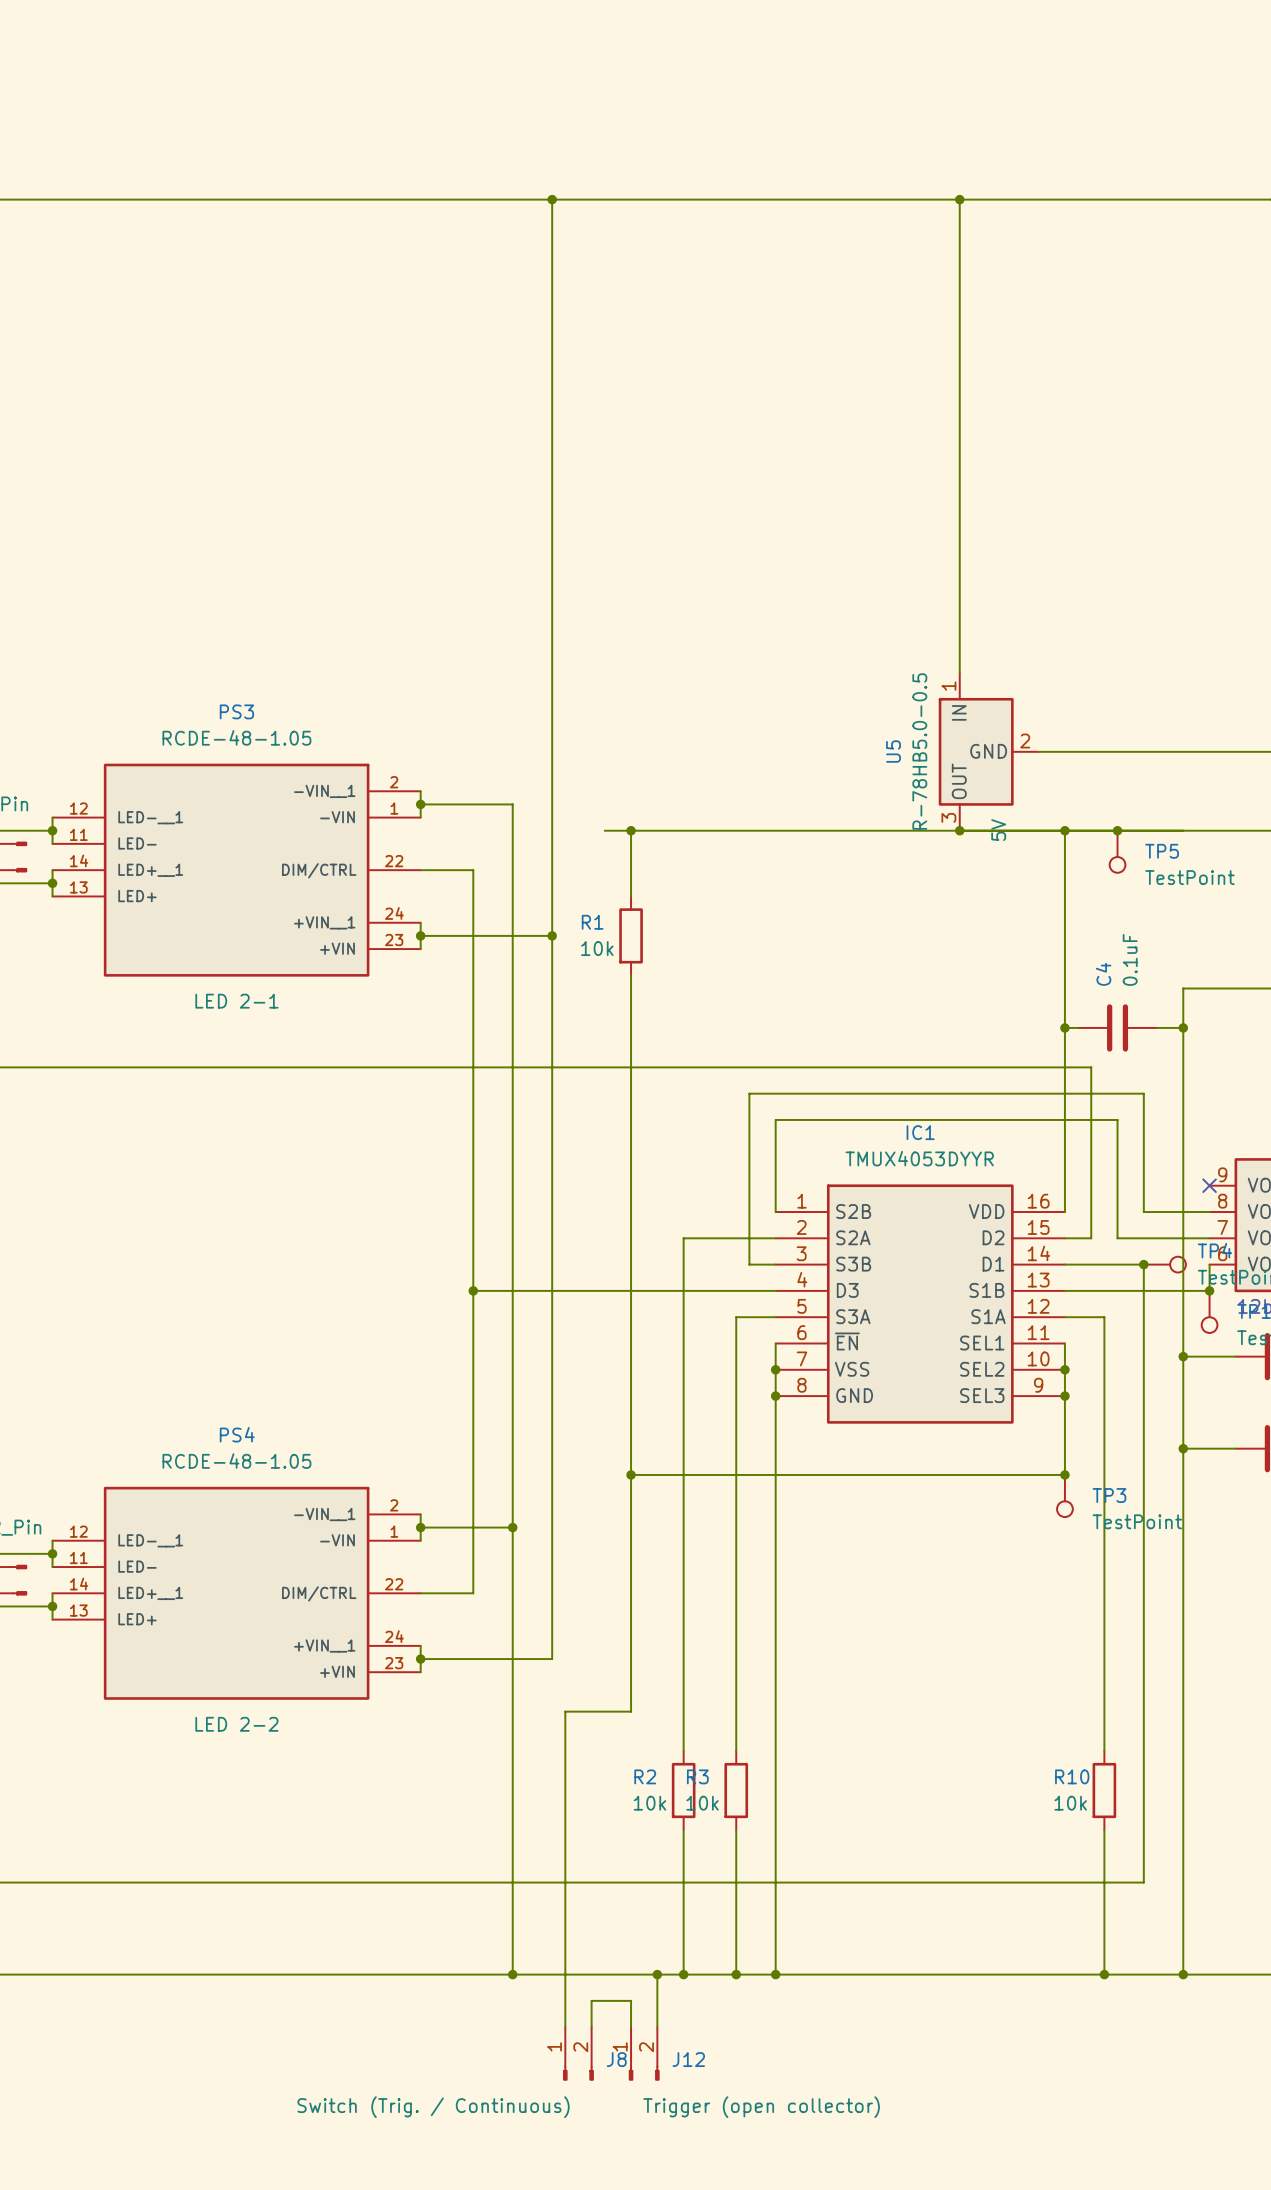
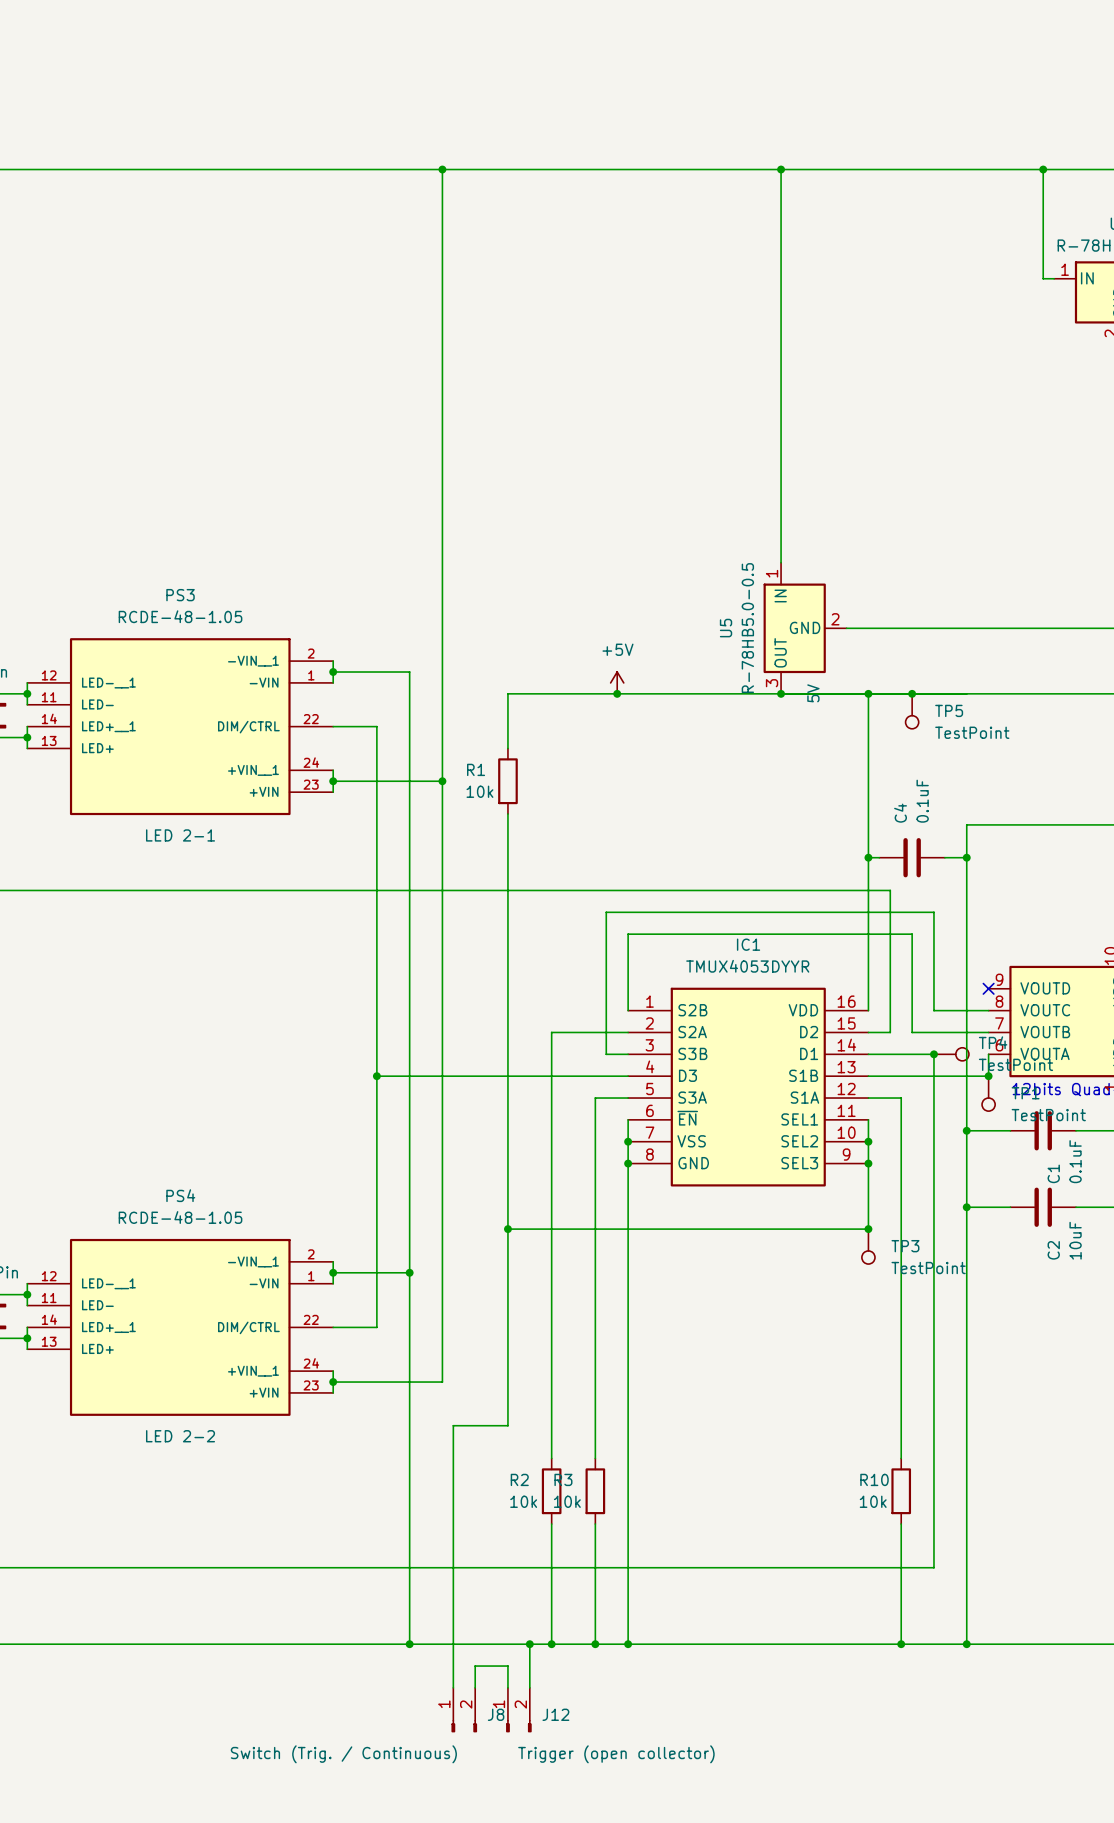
power symbol: none -> +5V (617, 682)
wire: (604, 830) (631, 830) -> none
junction: (631, 830) -> none
junction: none -> (617, 693)

